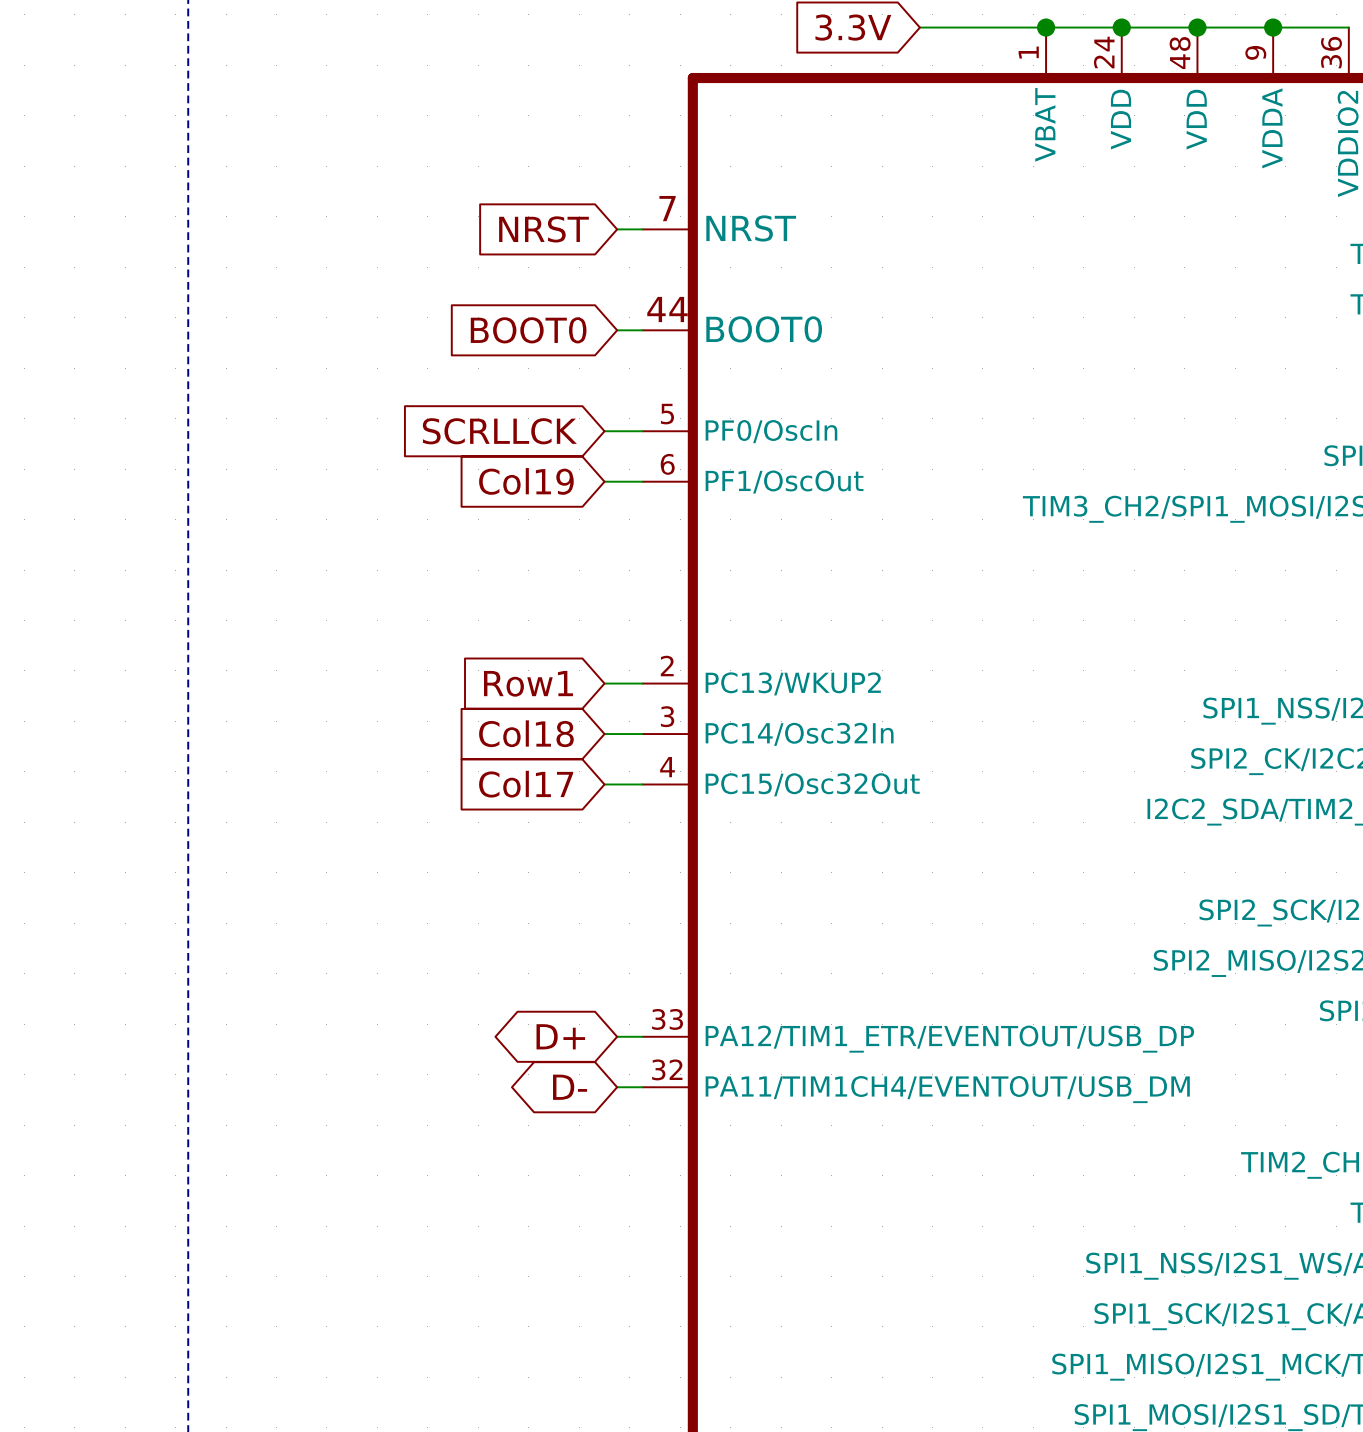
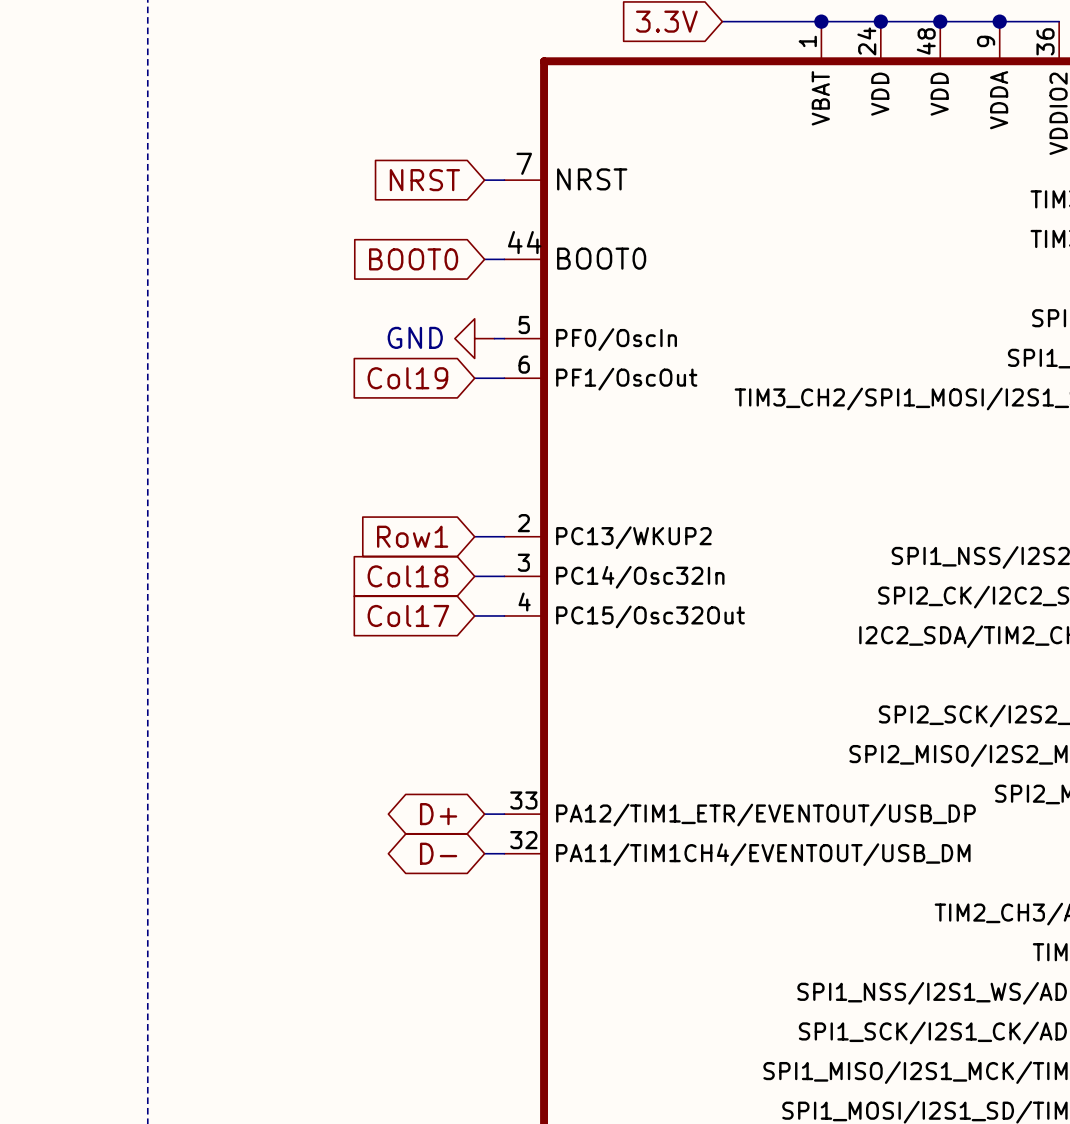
global label: SCRLLCK (499, 431) -> none
power symbol: none -> GND (474, 338)

